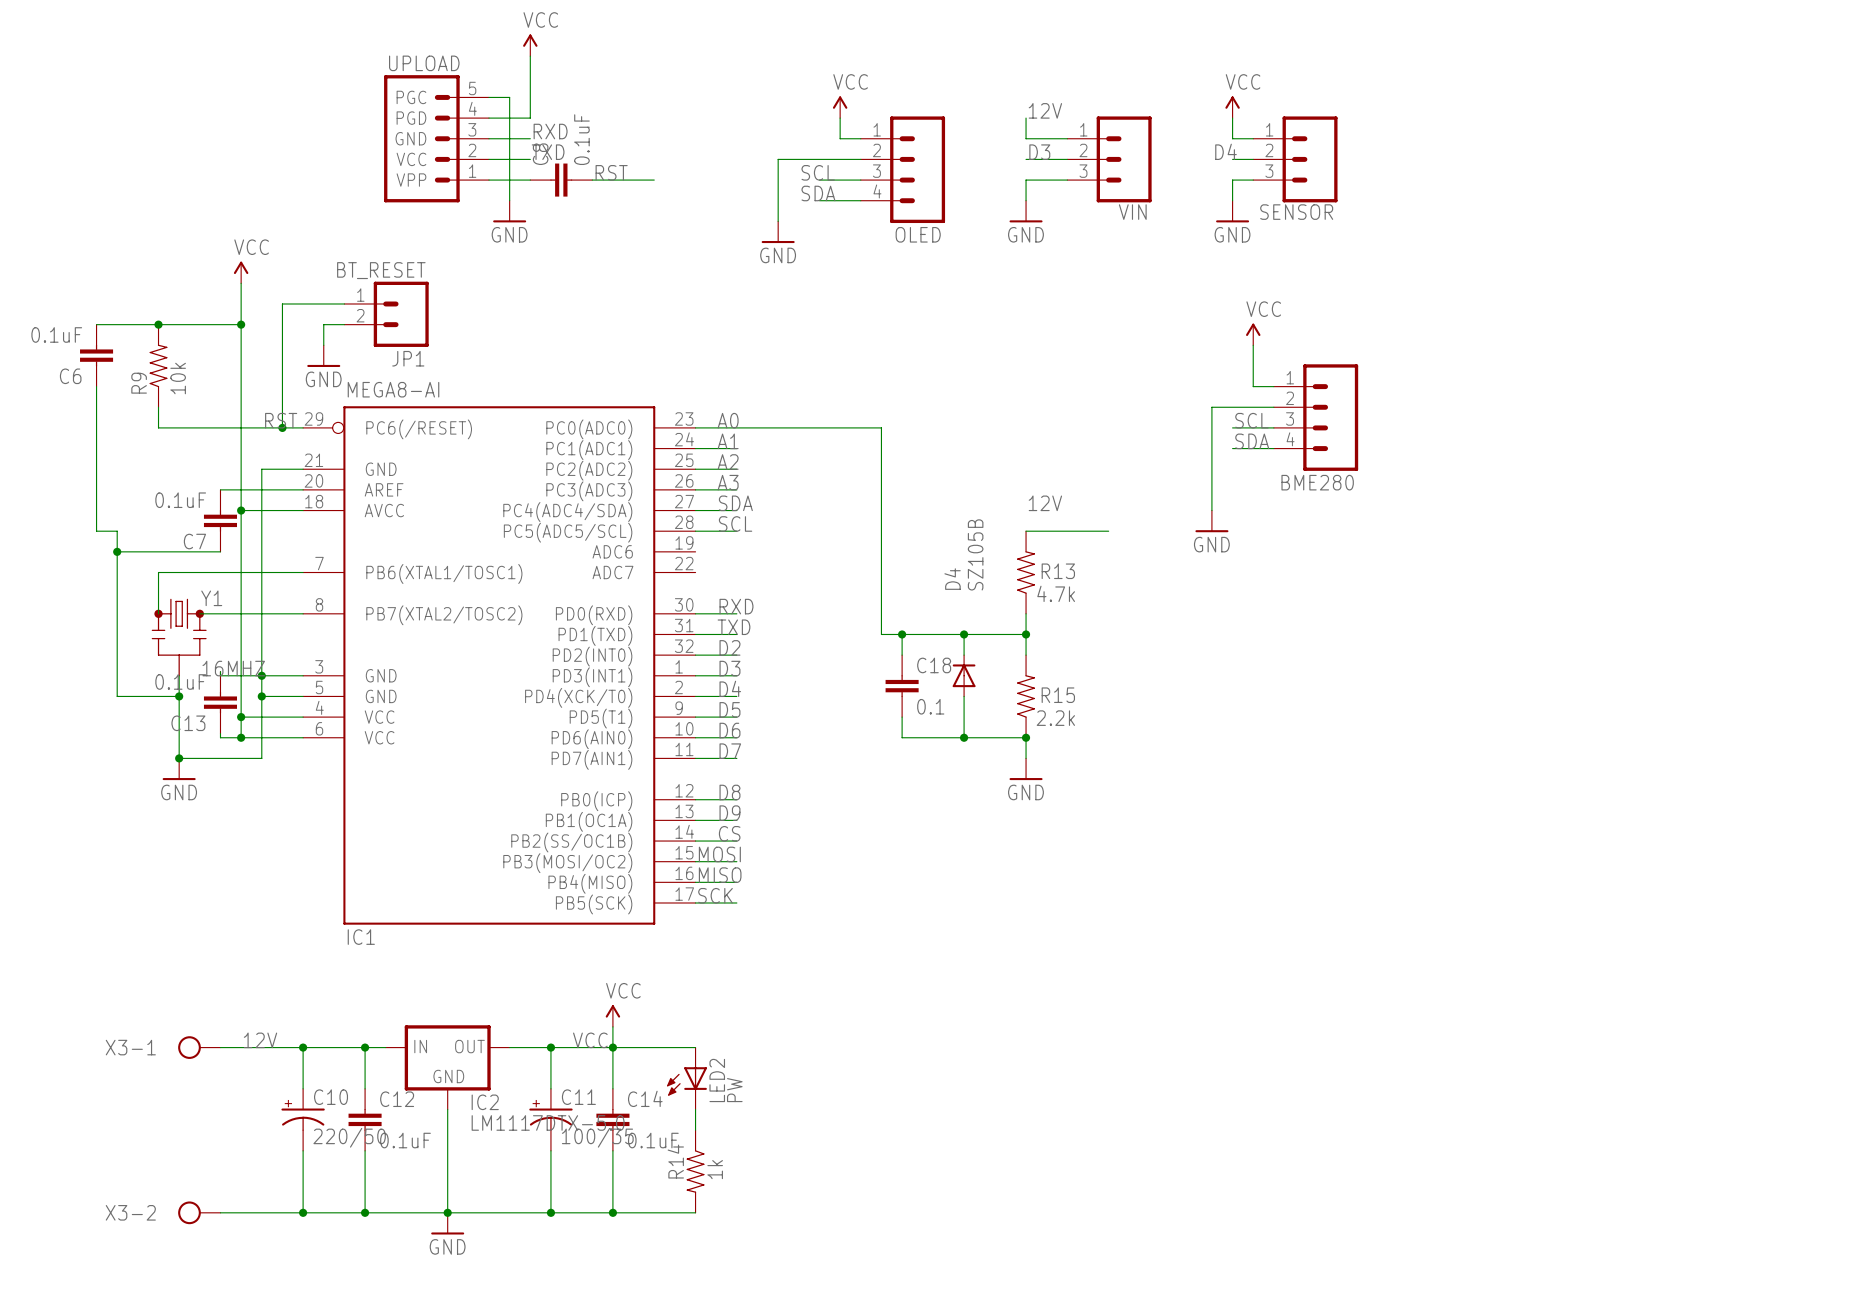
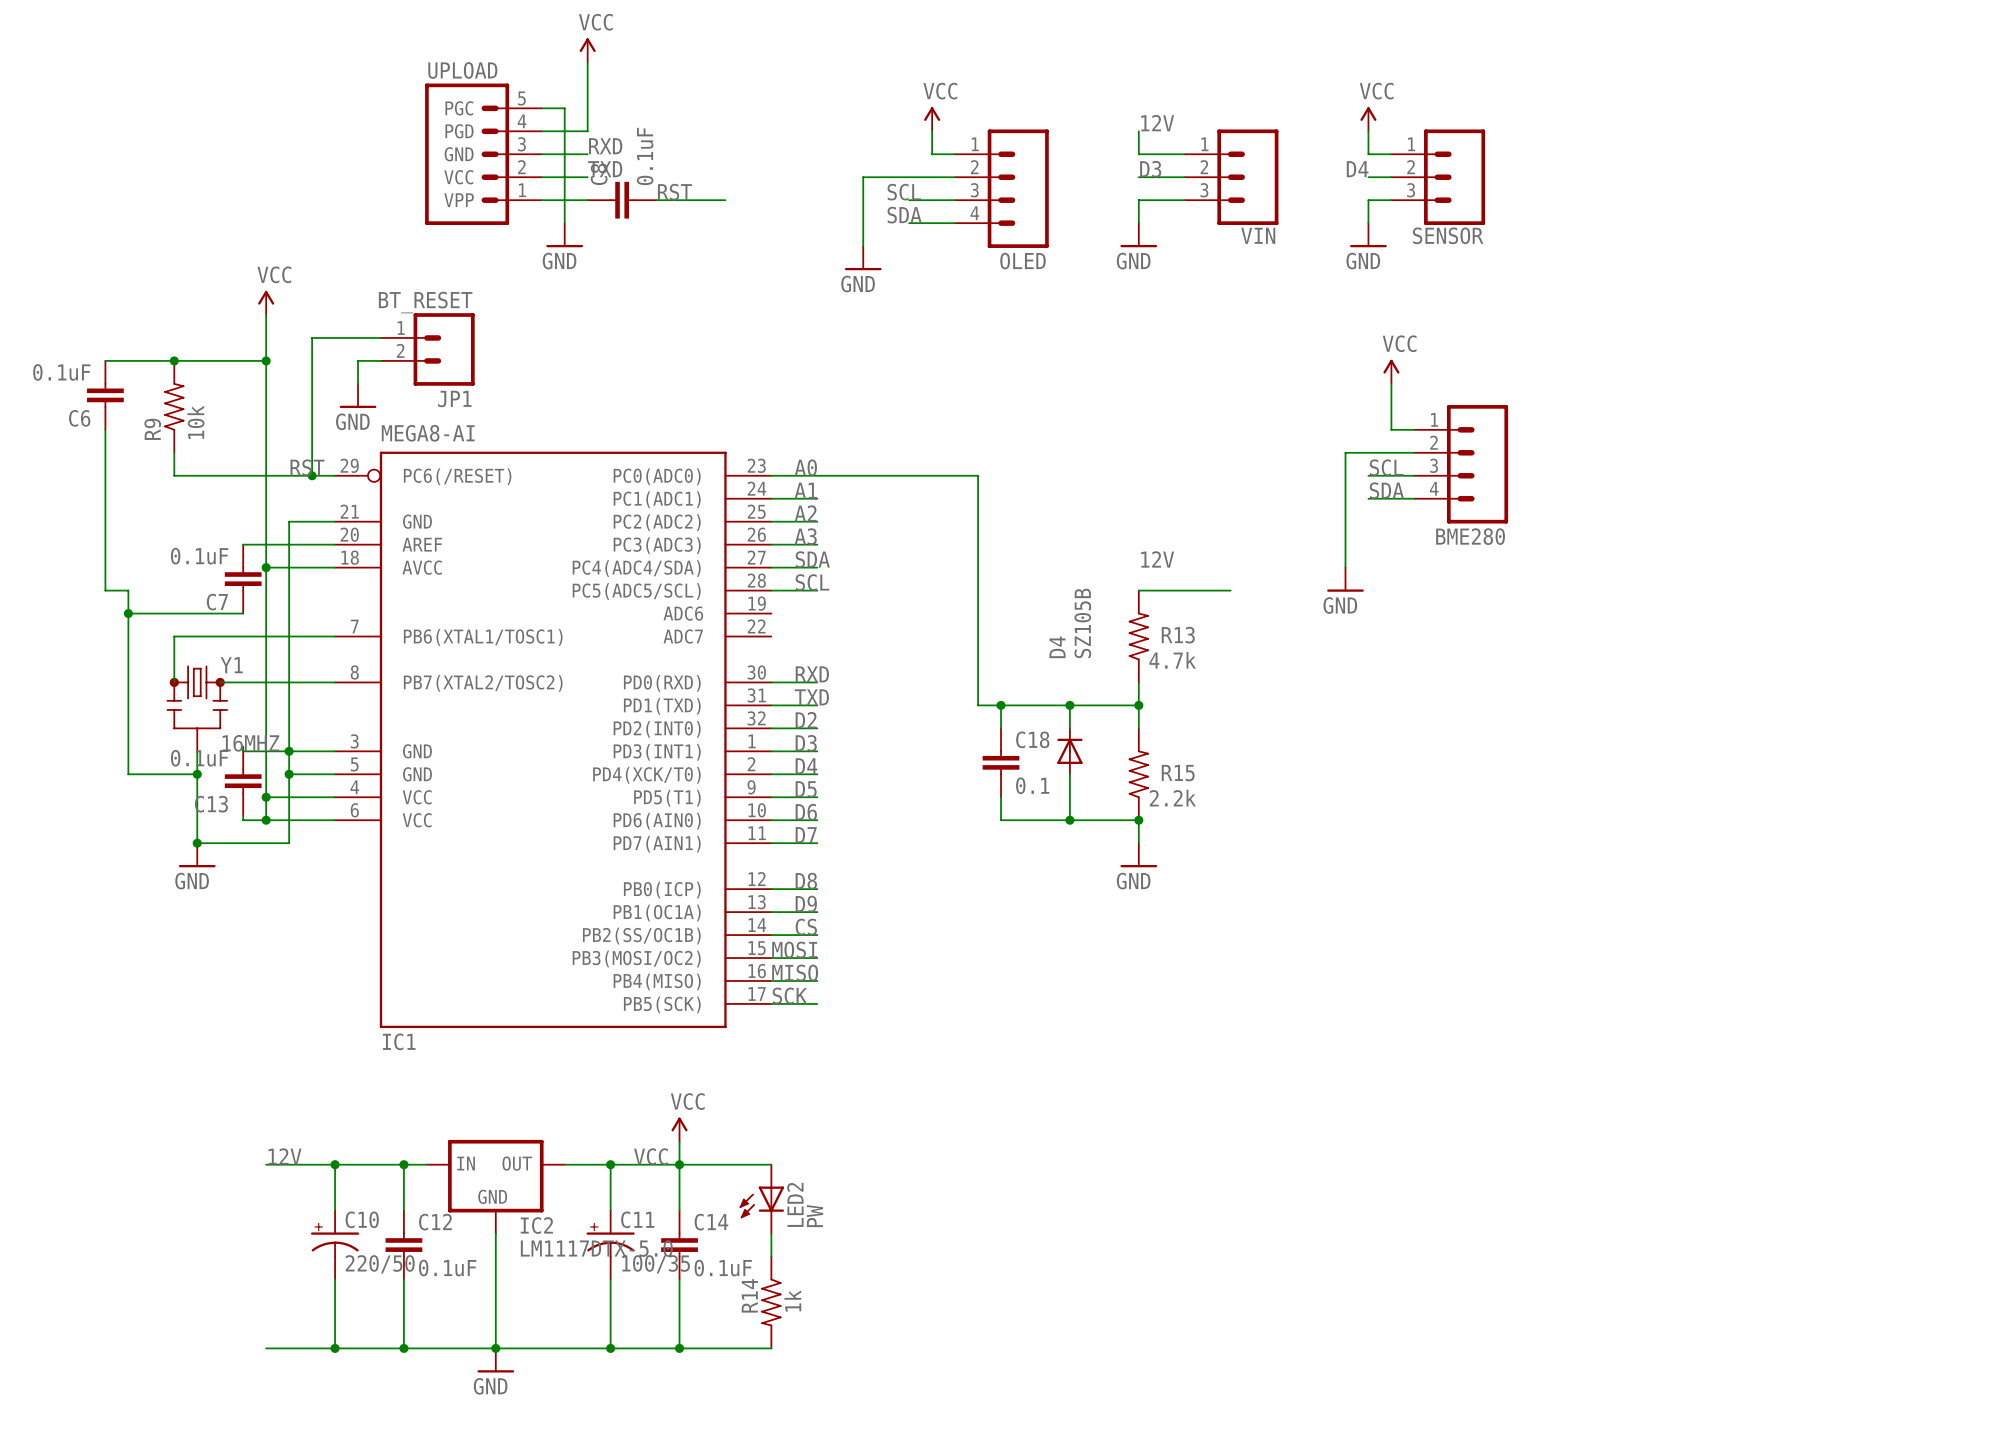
X3-1: (199, 1047) -> none
wire: (220, 1047) (241, 1047) -> none
X3-2: (199, 1212) -> none
wire: (220, 1212) (241, 1212) -> none

